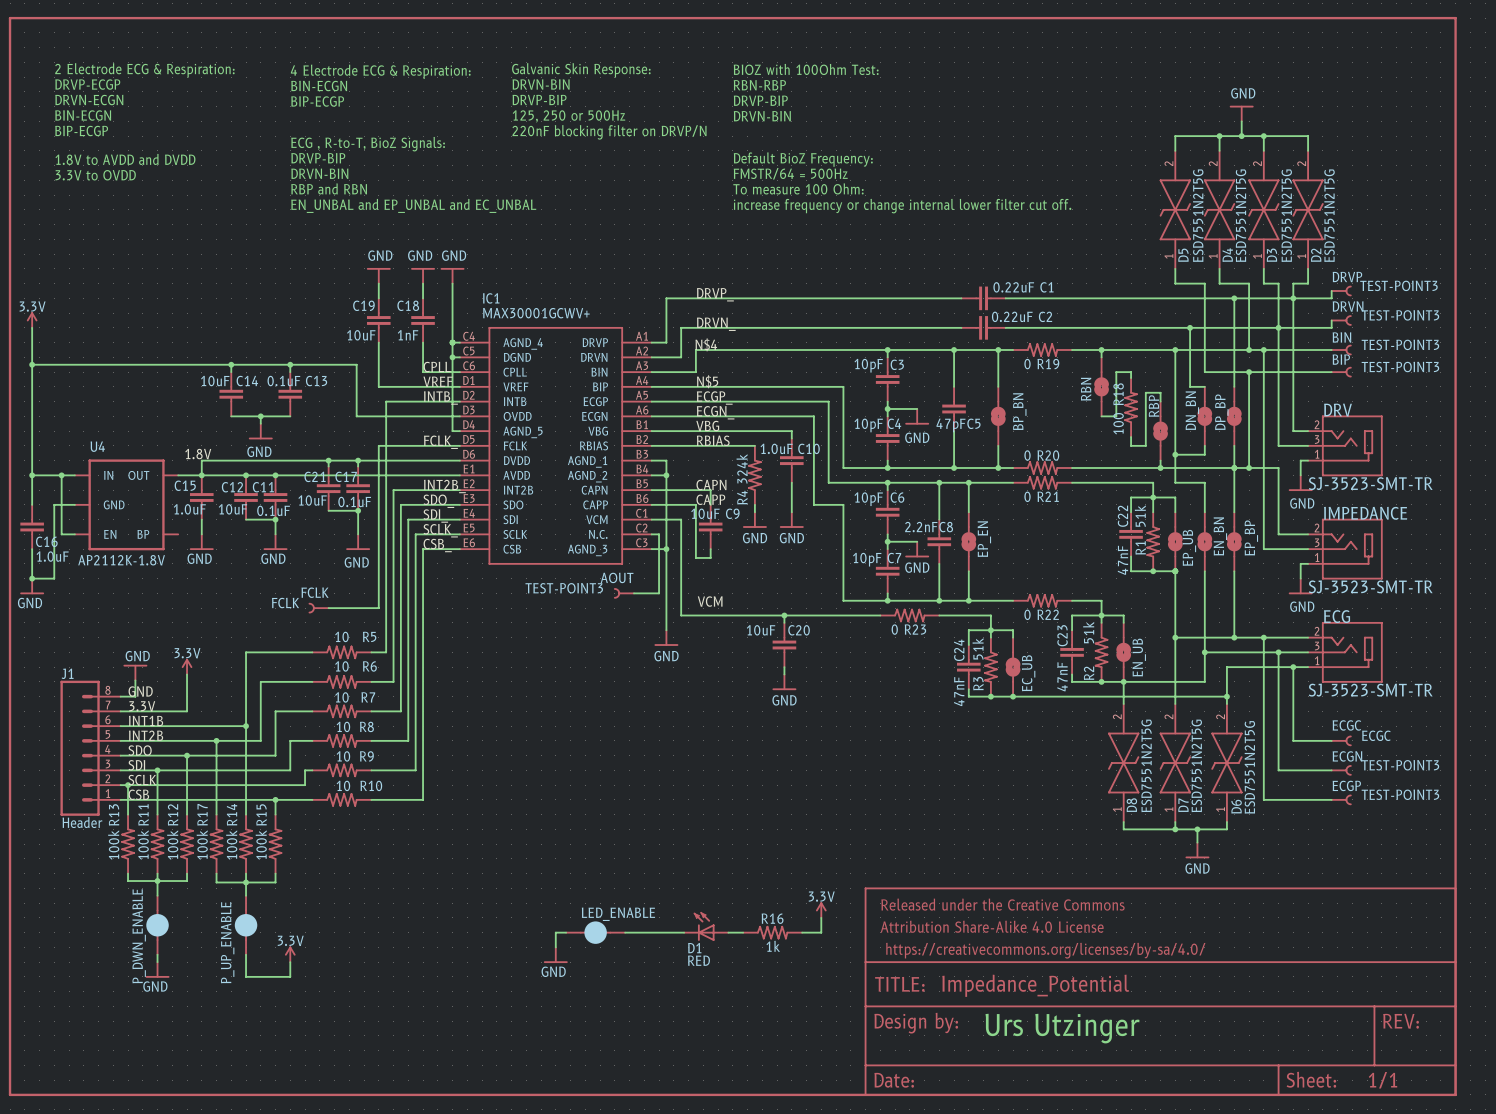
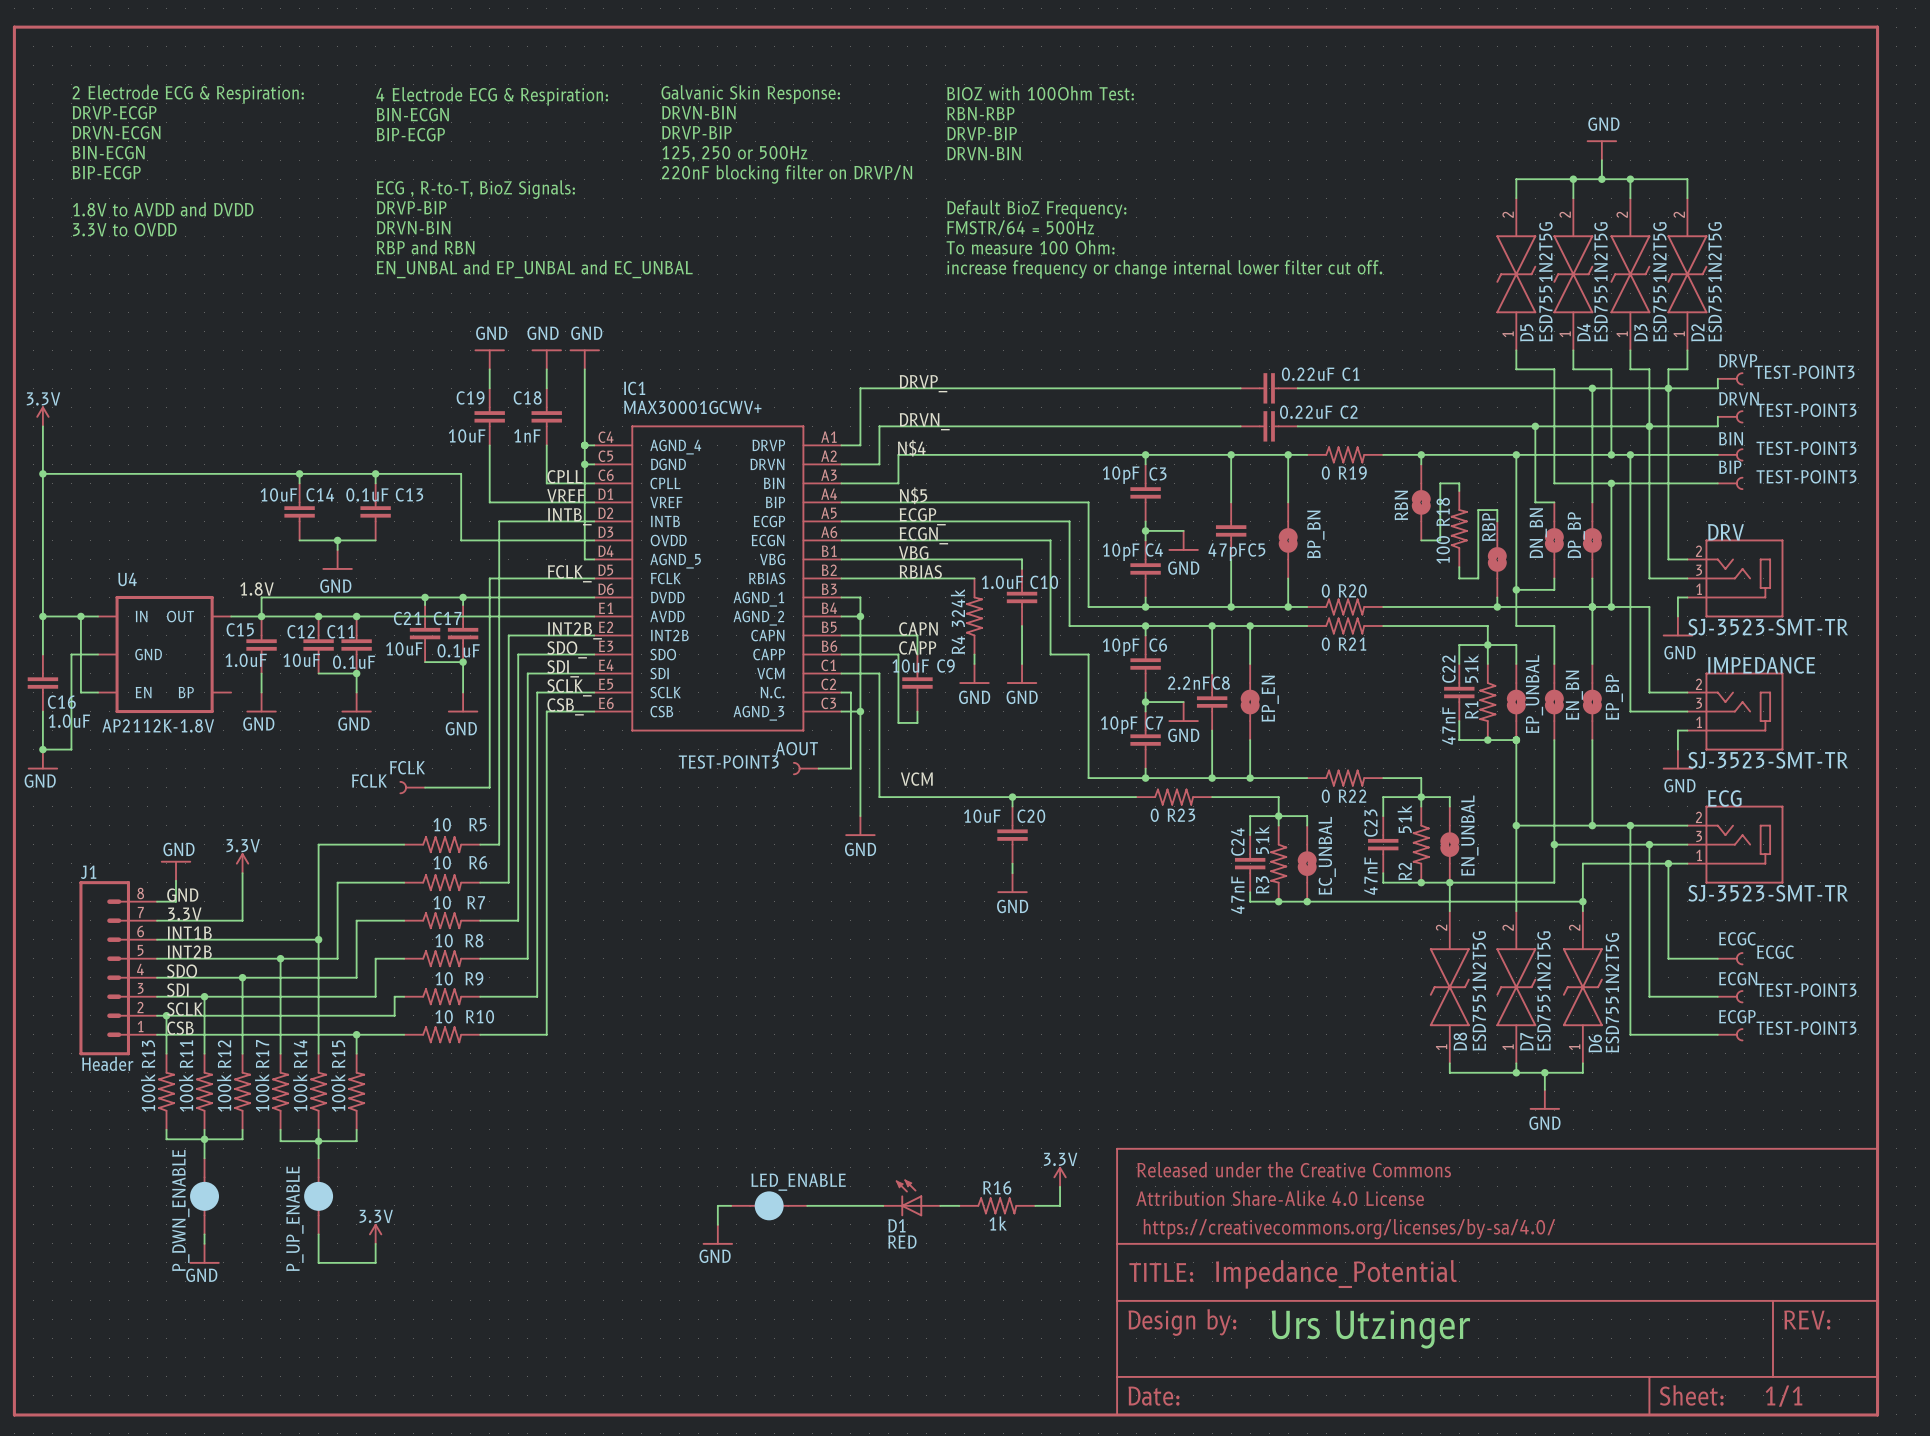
EP_UB name: EP_UB (1189, 547) -> EP_UNBAL (1534, 694)
EN_UB name: EN_UB (1139, 657) -> EN_UNBAL (1469, 835)
EC_UB name: EC_UB (1028, 673) -> EC_UNBAL (1327, 855)

